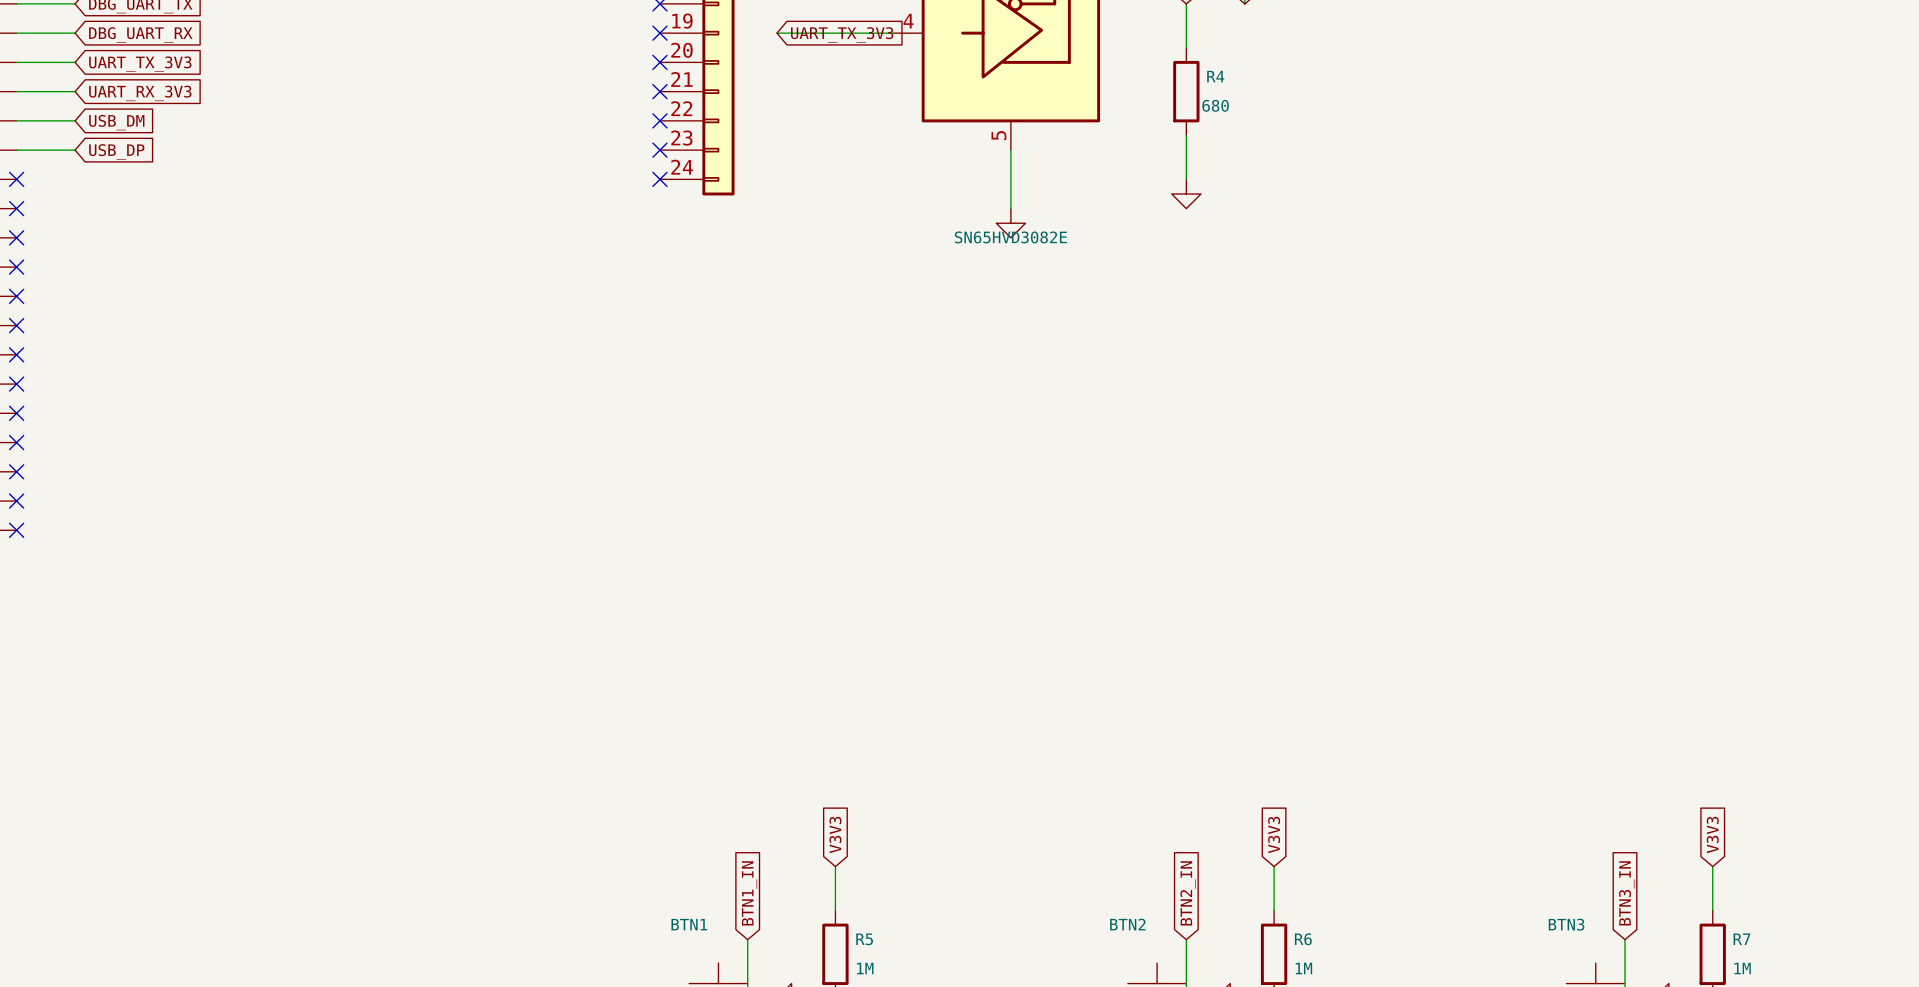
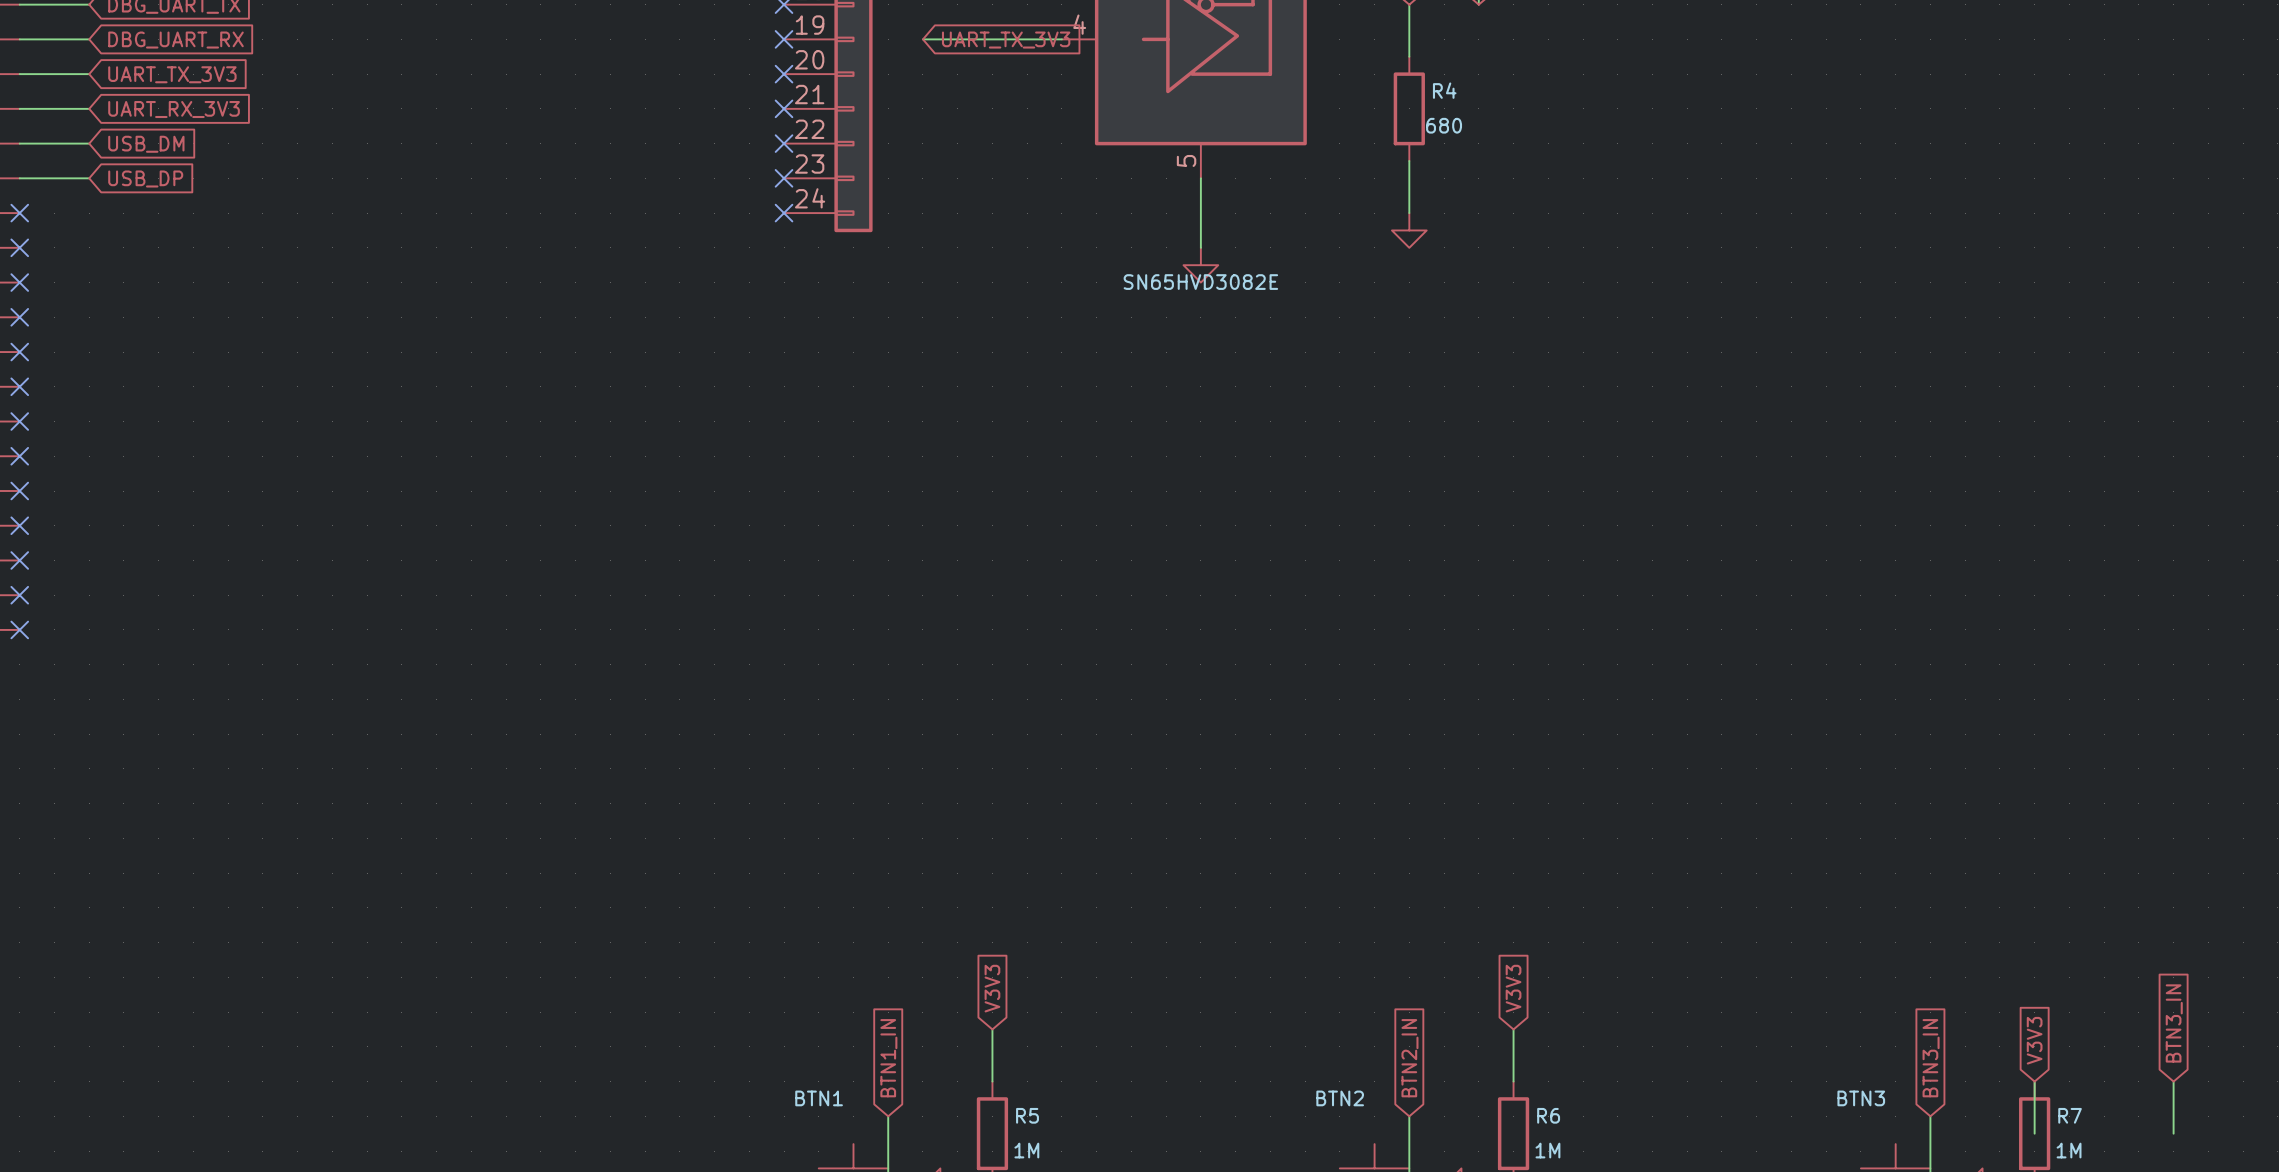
global label position: V3V3 (1712, 834) -> V3V3 (2034, 1040)
global label: none -> BTN3_IN (2174, 1023)
wire: (1712, 866) (1712, 910) -> (2034, 1133) (2034, 1081)
wire: none -> (2173, 1081) (2173, 1133)

